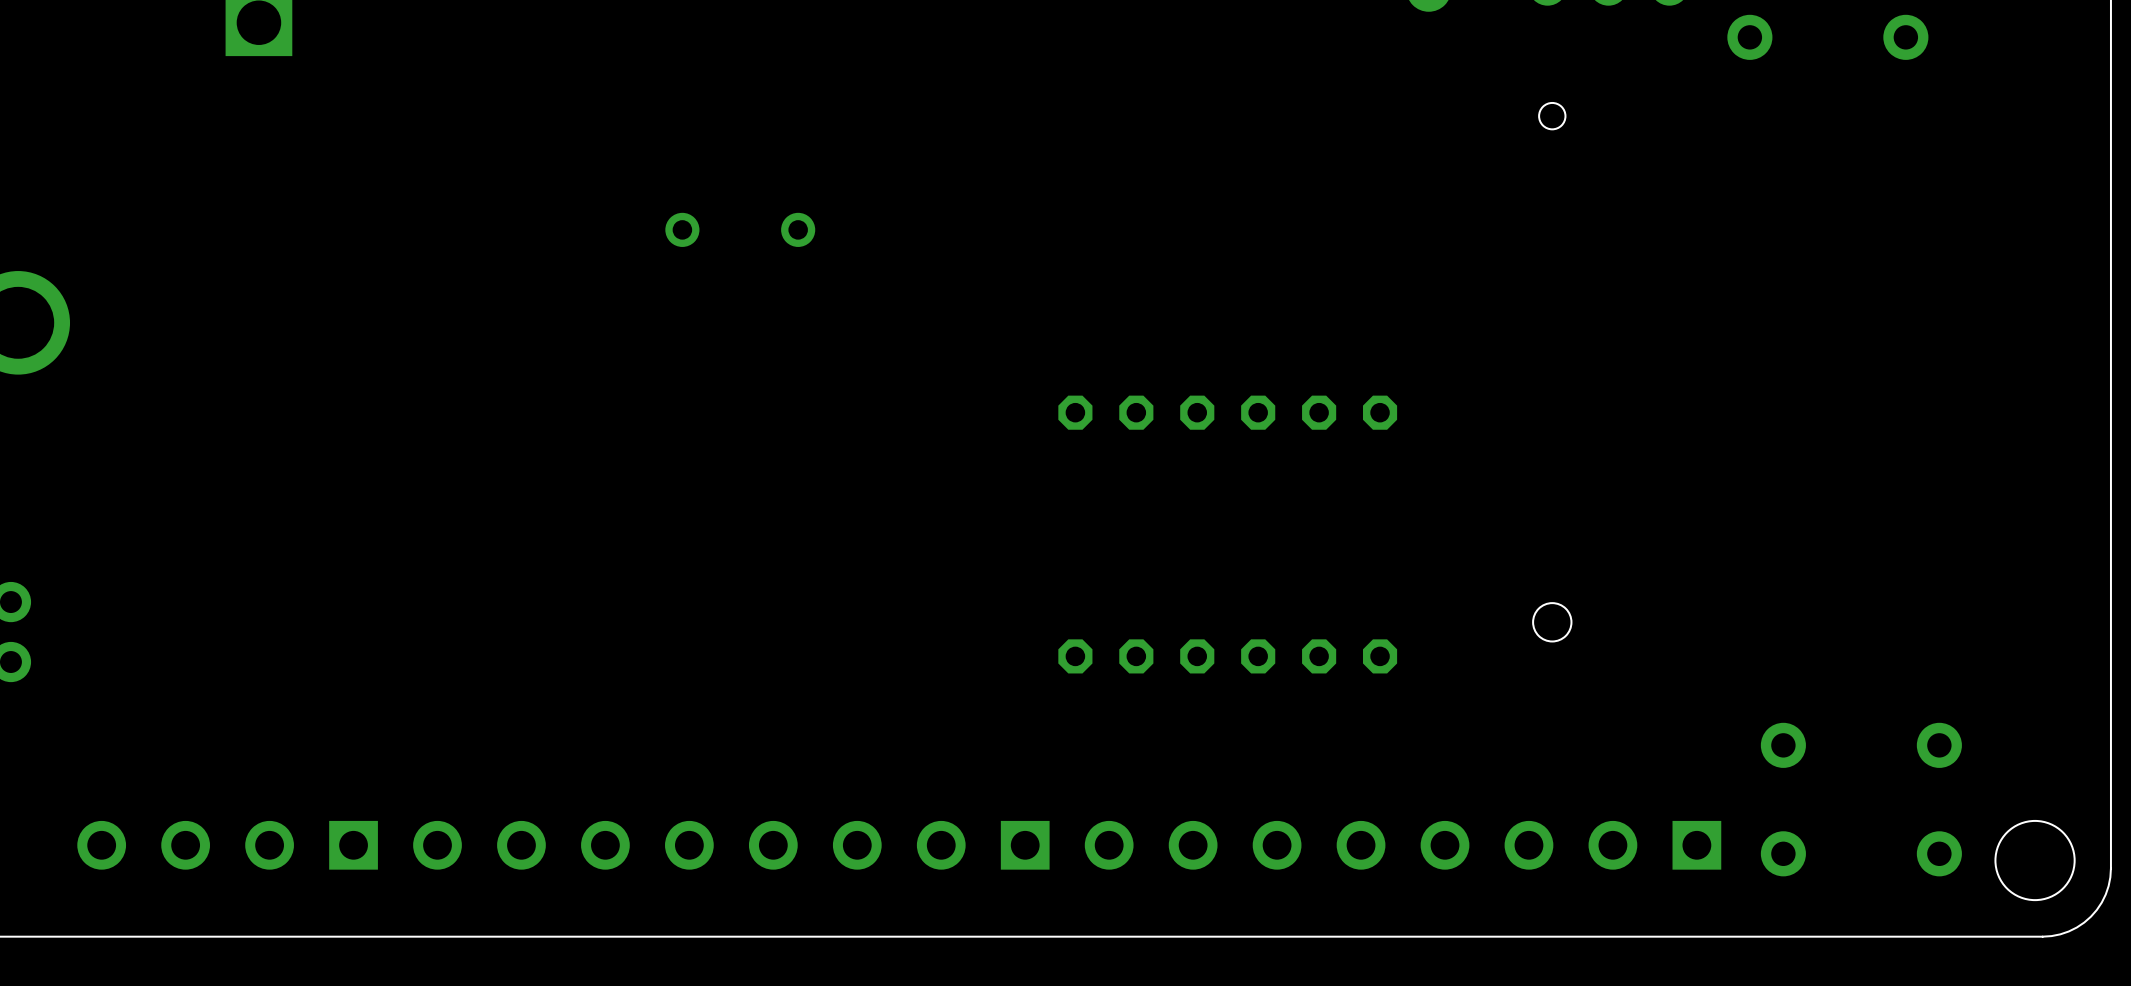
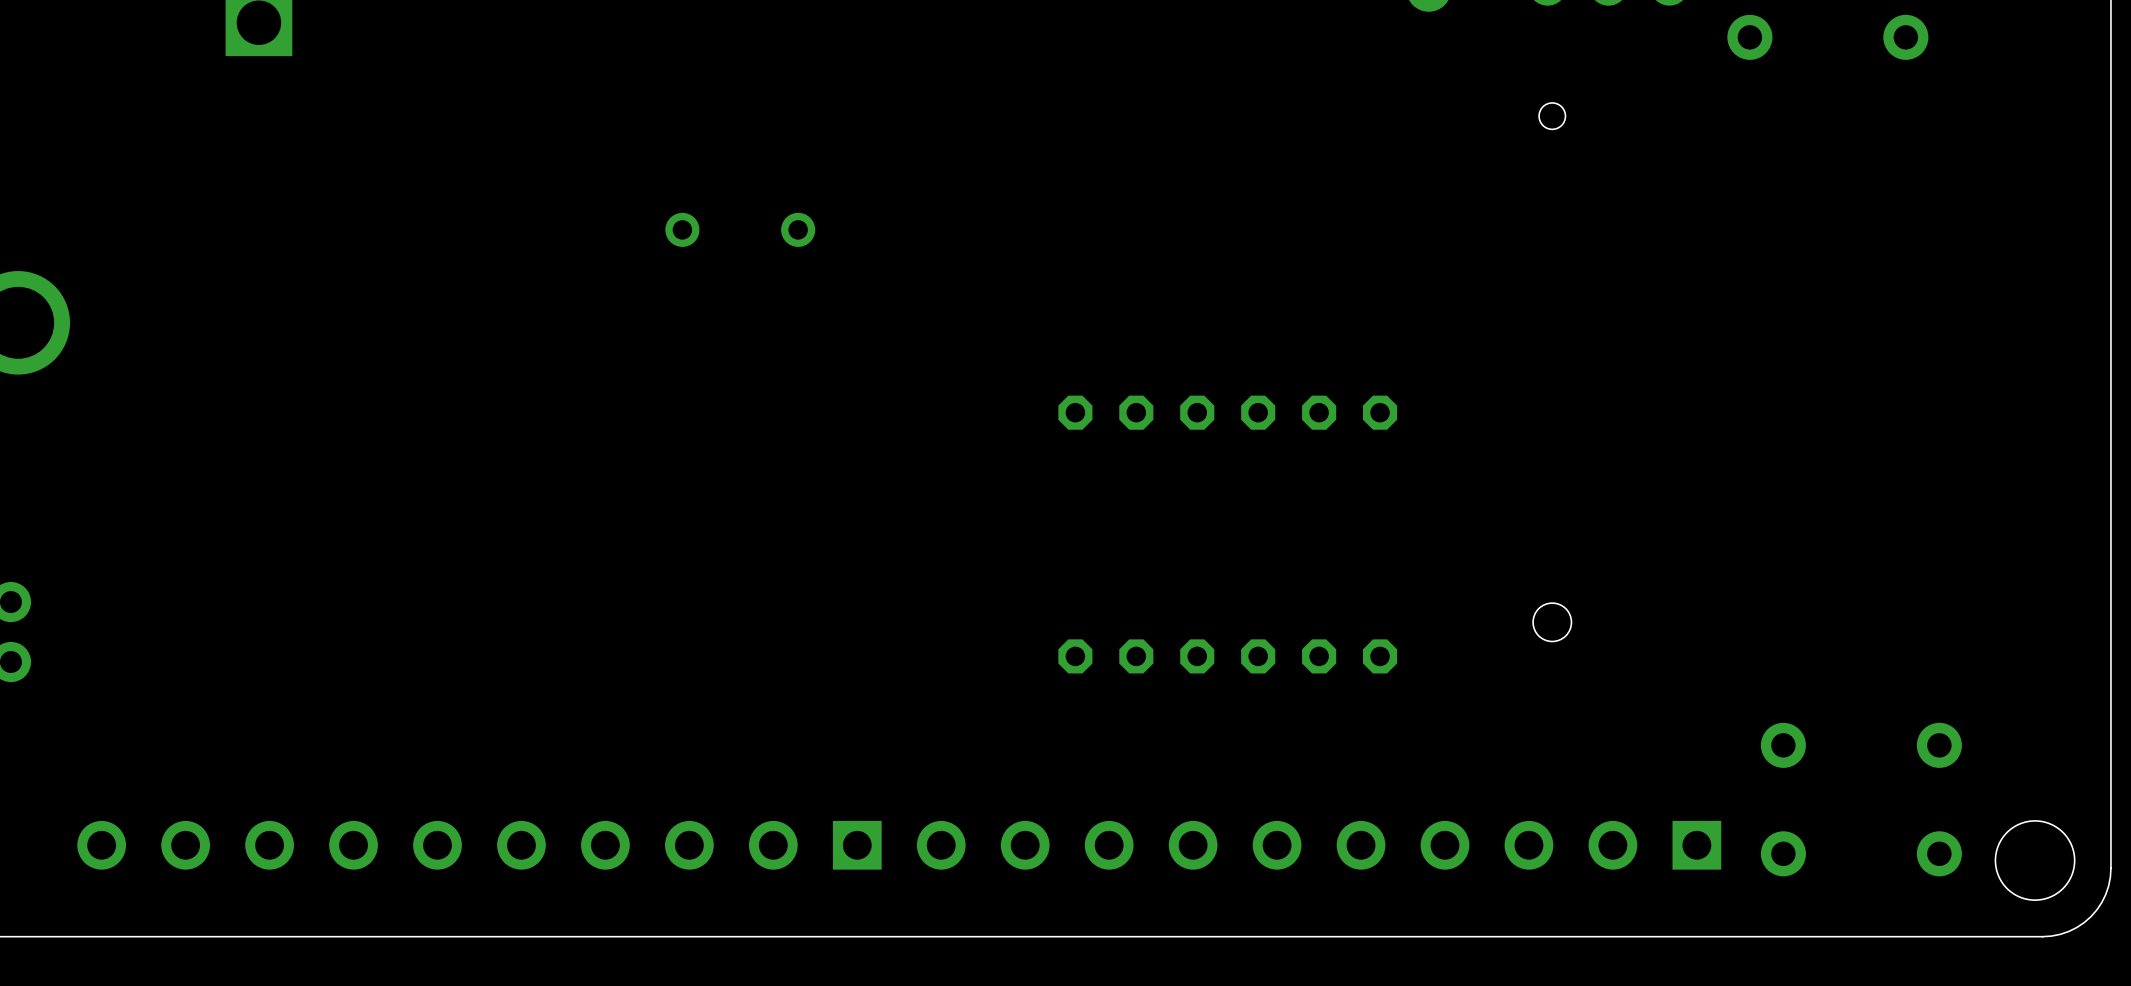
part: (227, 845) -> none
part: none -> (479, 845)
part: (731, 845) -> none
part: none -> (1319, 845)

